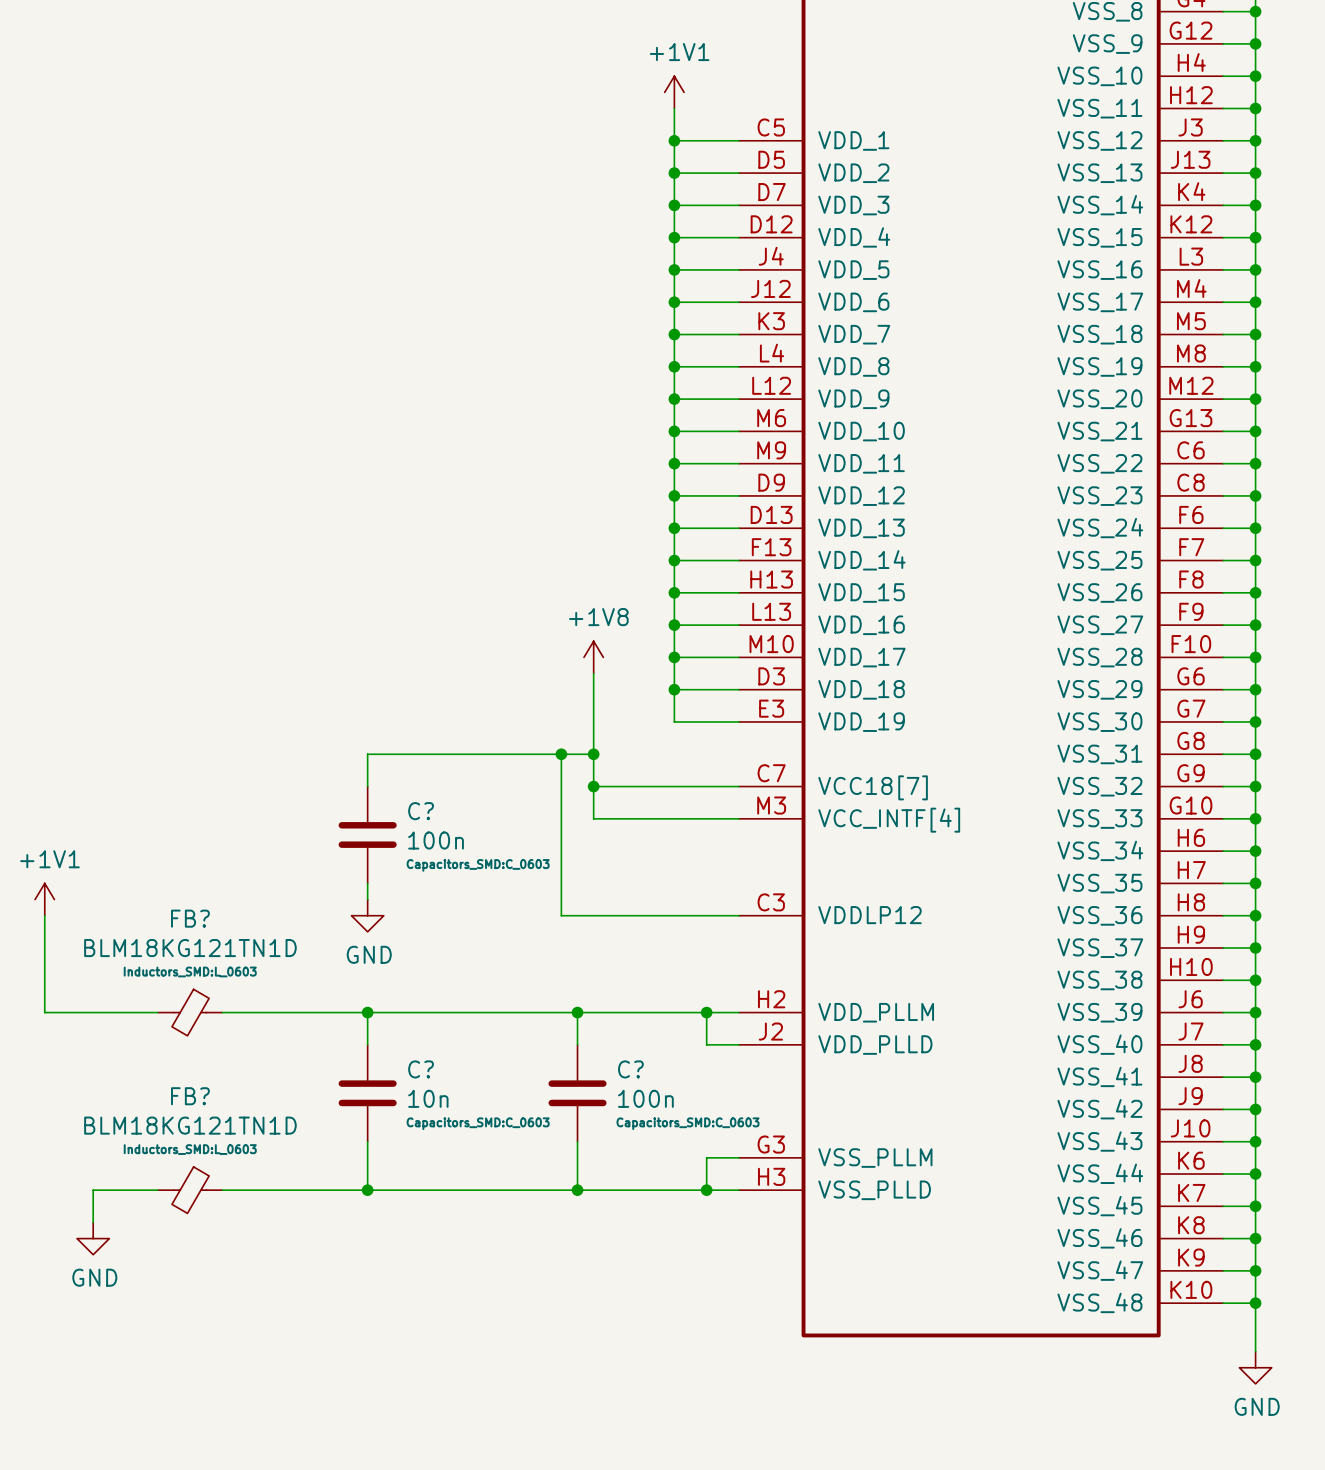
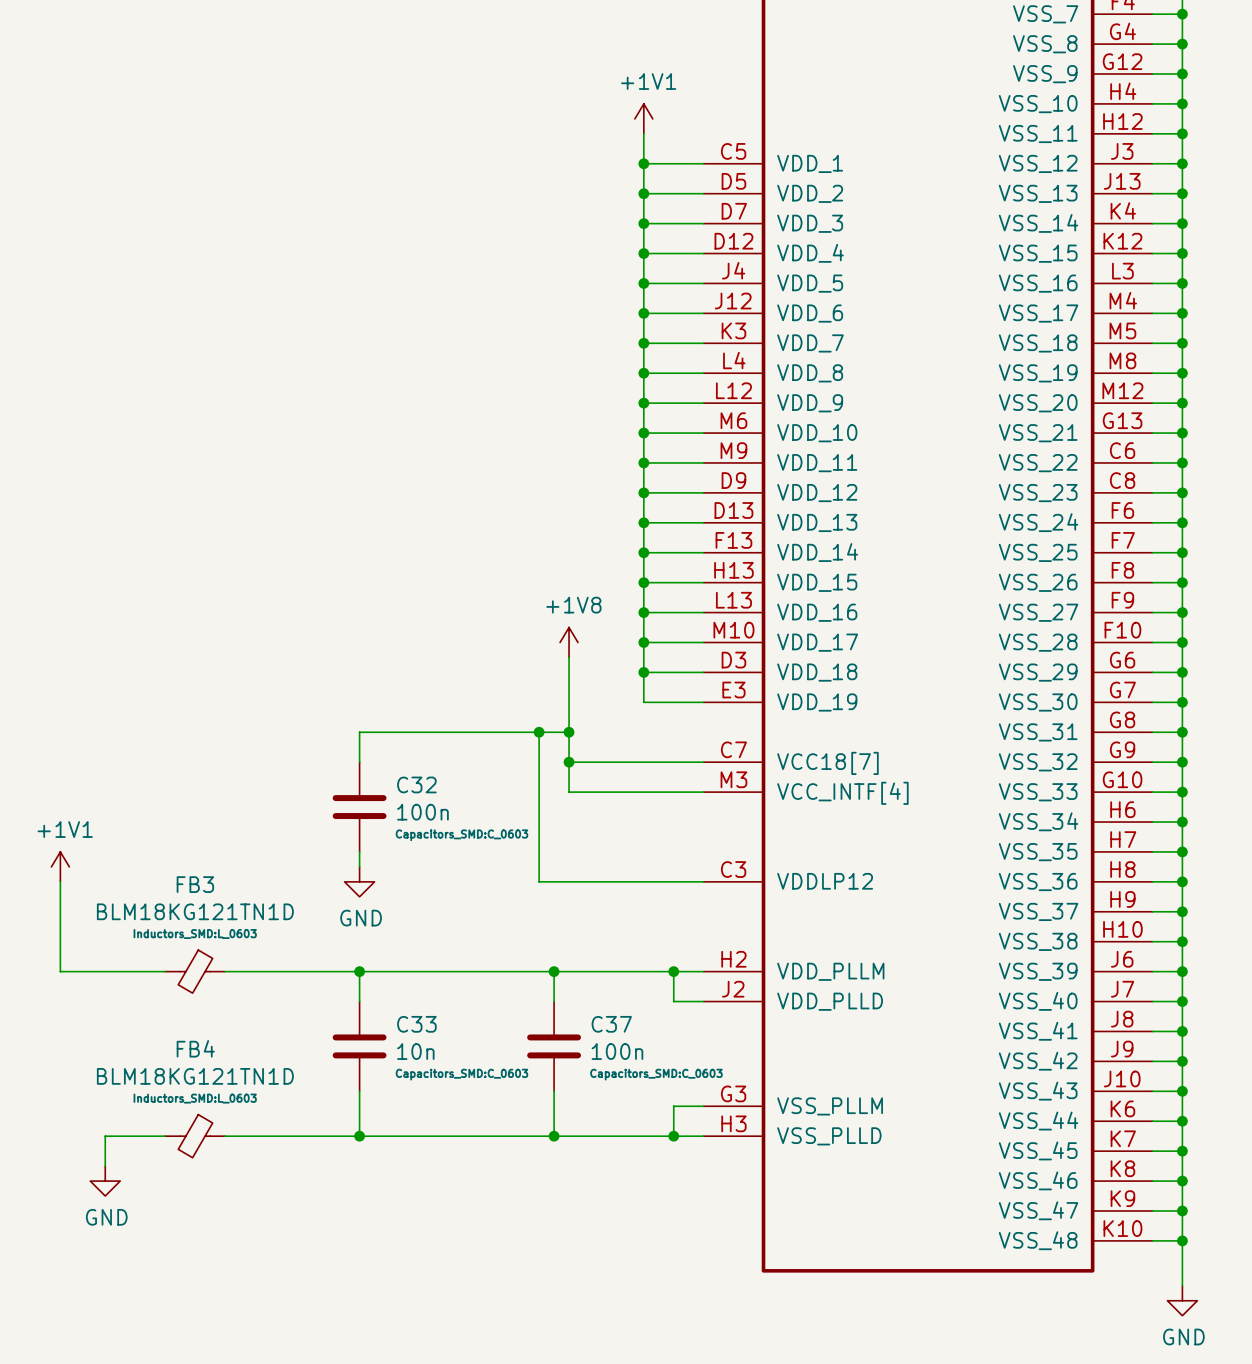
C? name: C? (421, 811) -> C32 (416, 784)
FB? name: FB? (190, 918) -> FB3 (195, 884)
C? name: C? (421, 1069) -> C33 (416, 1024)
C? name: C? (630, 1069) -> C37 (611, 1024)
FB? name: FB? (190, 1096) -> FB4 (195, 1048)

